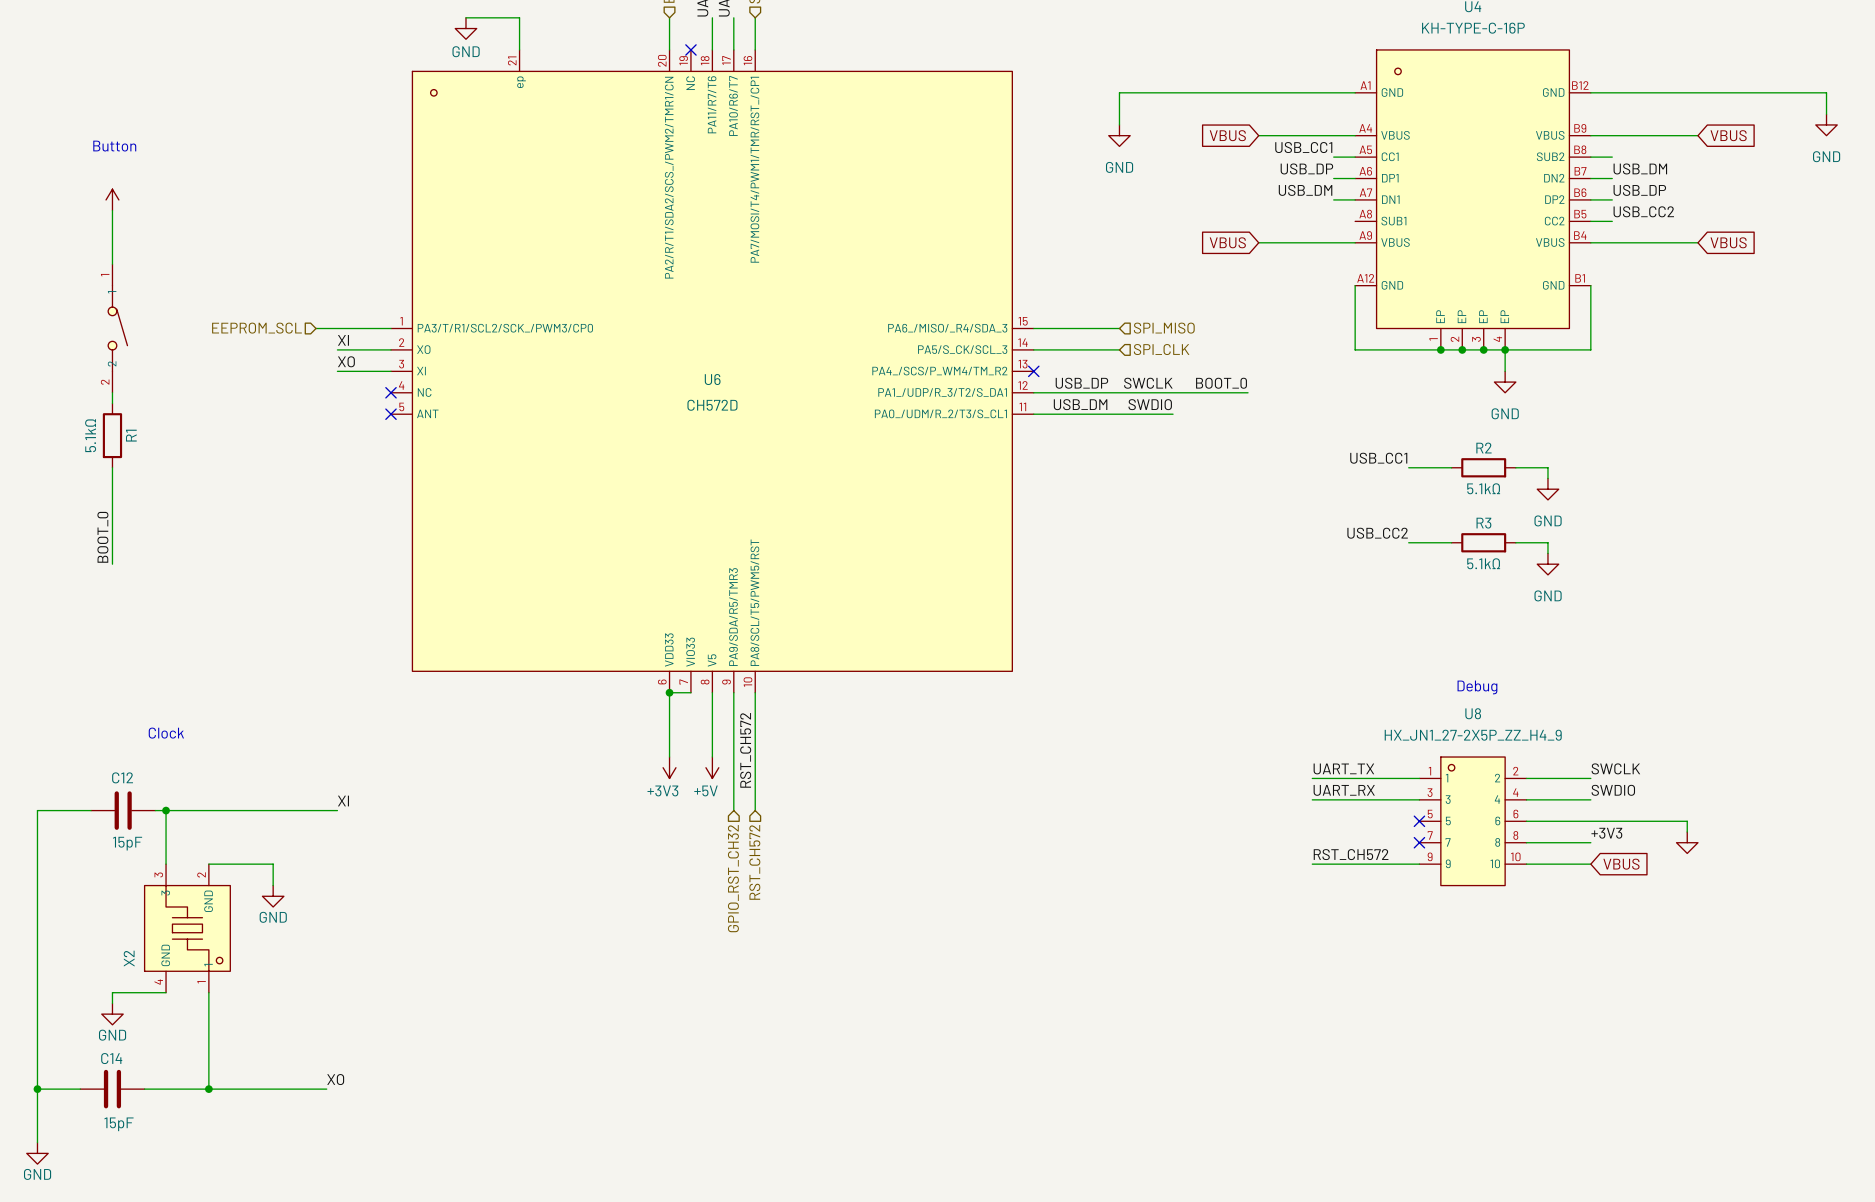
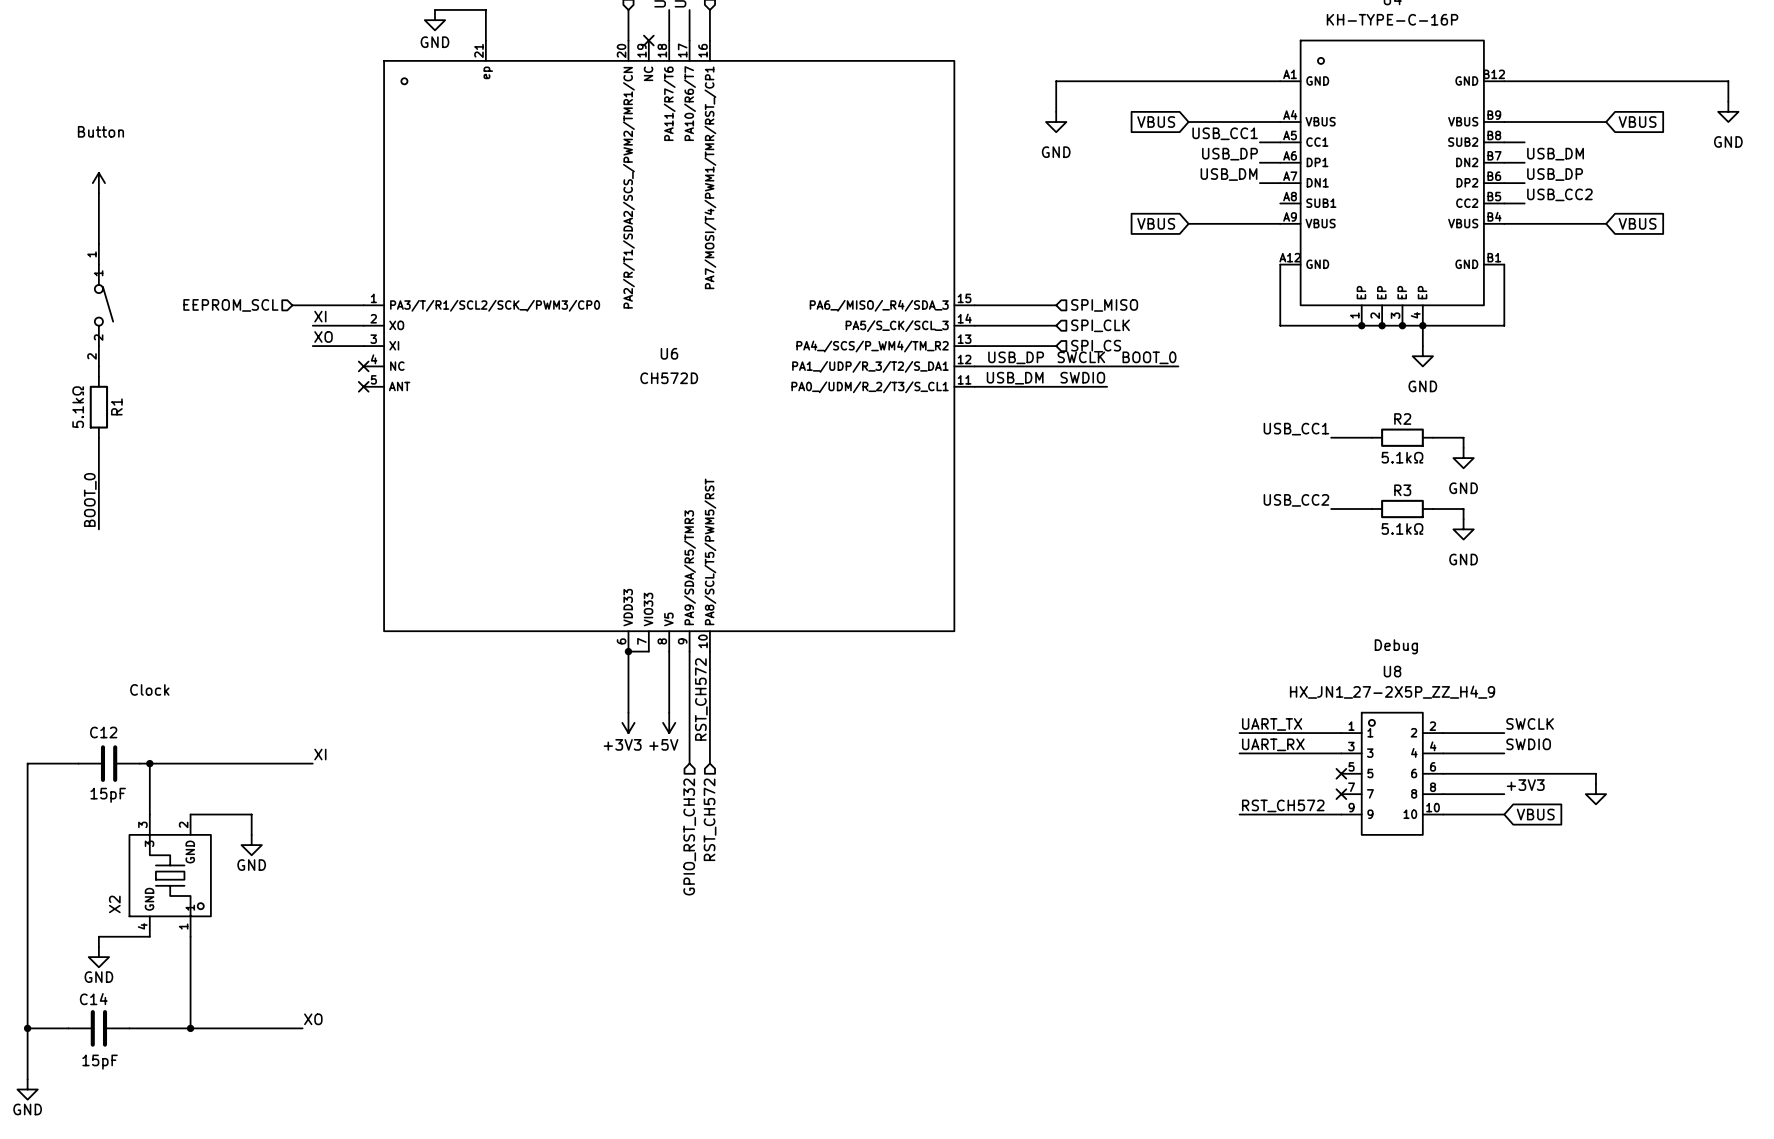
hierarchical label: none -> SPI_CS (1096, 346)
wire: none -> (974, 346) (1056, 346)
no-connect mark: (1033, 371) -> none

